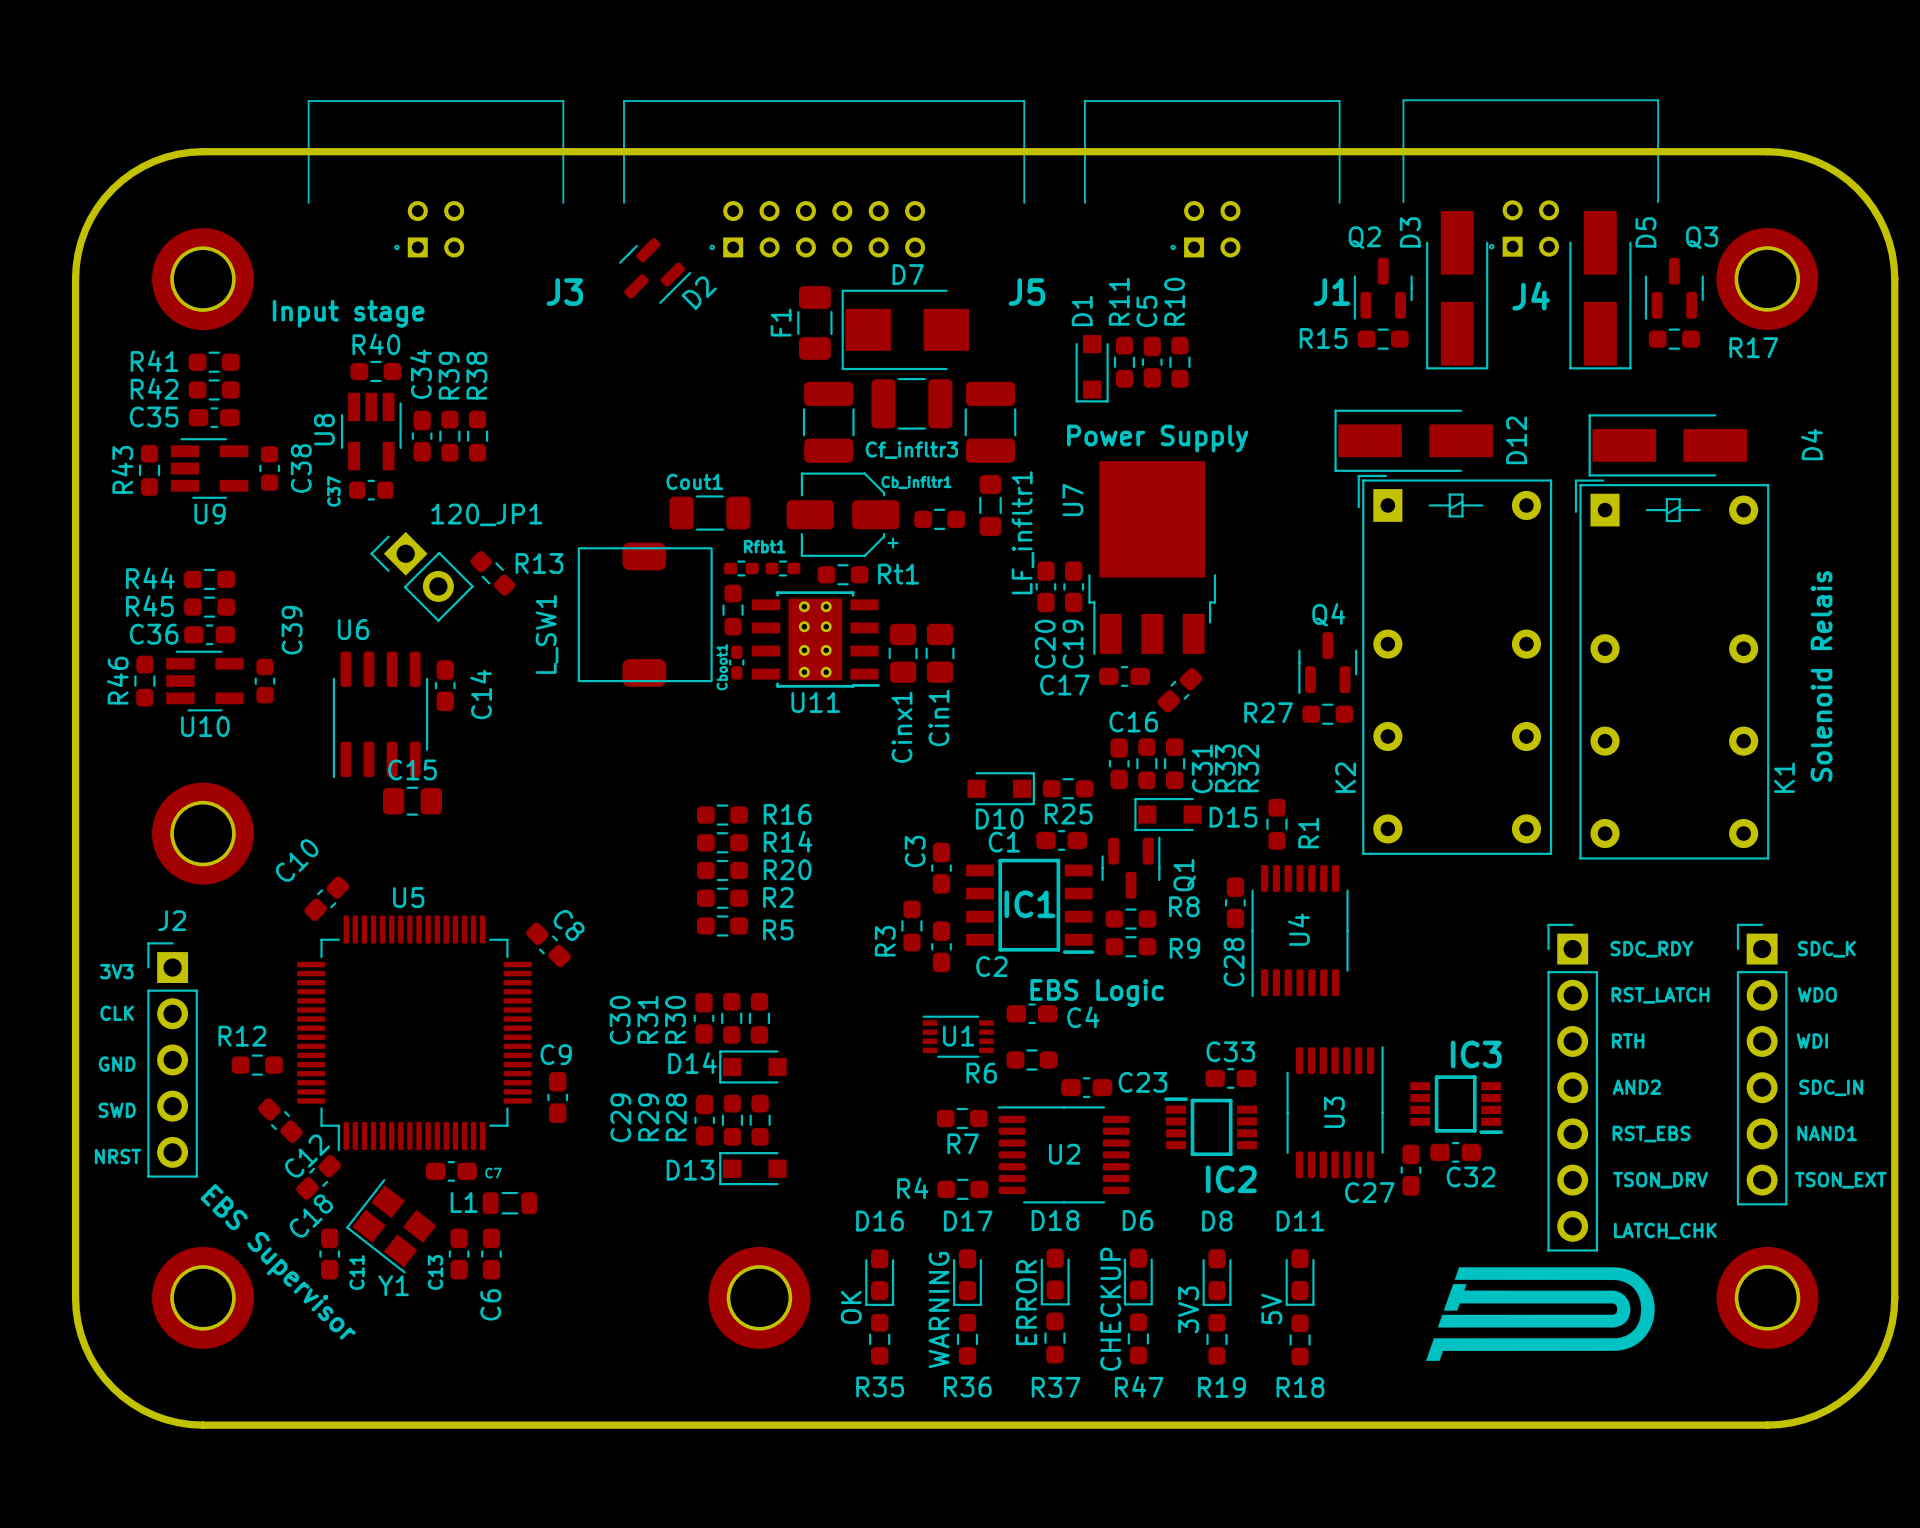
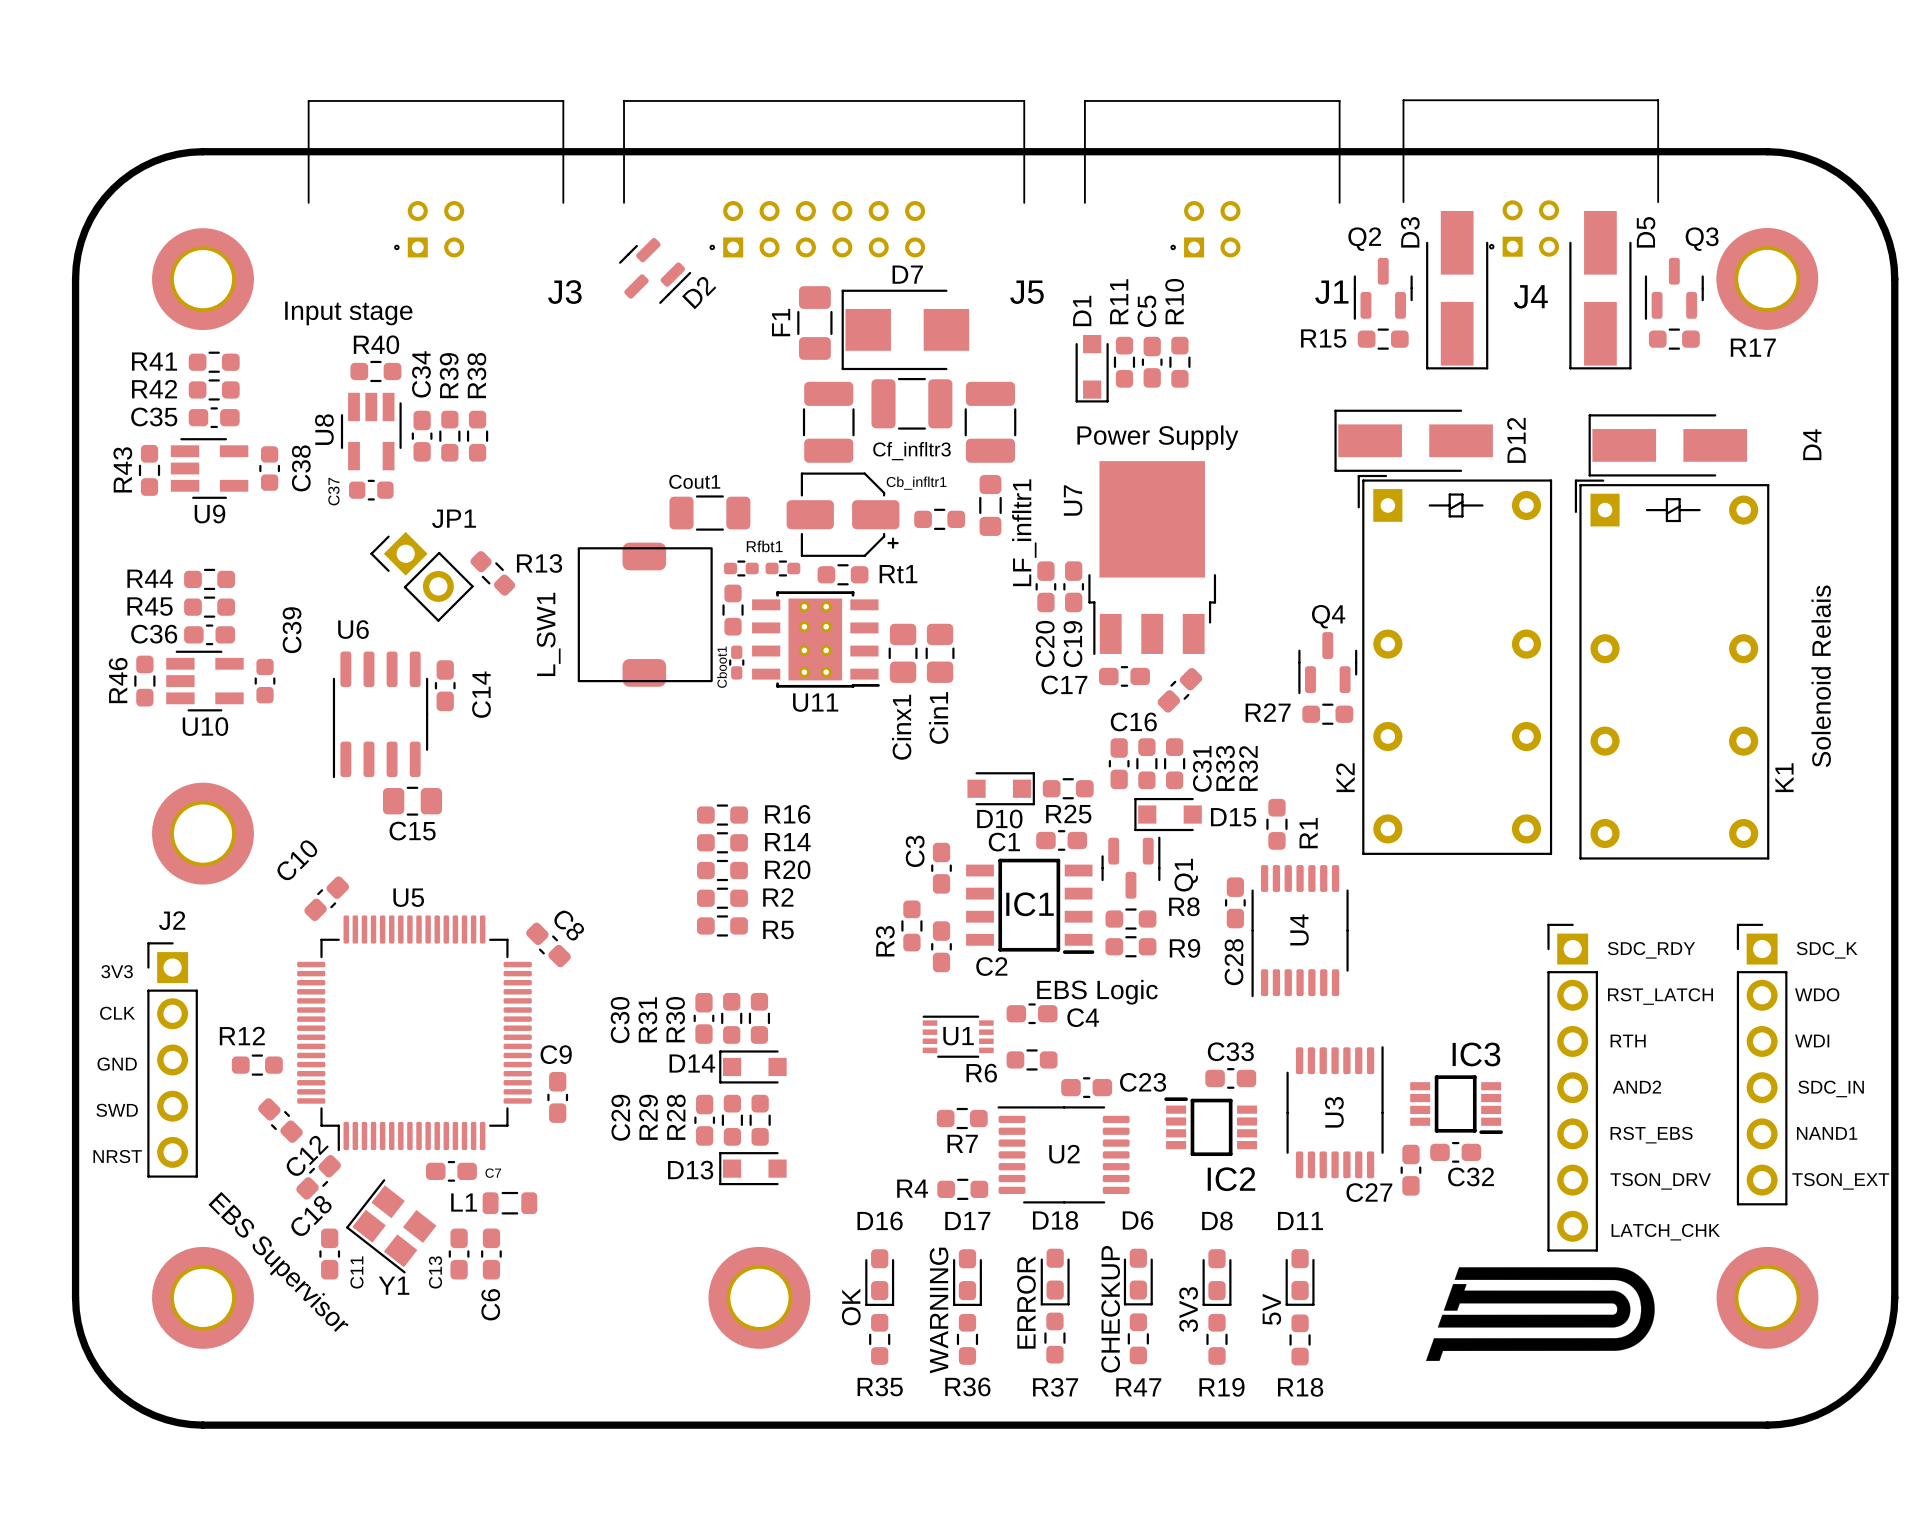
120_JP1 name: 120_JP1 (486, 514) -> JP1 (454, 518)
C15 name position: C15 (412, 769) -> C15 (412, 831)

